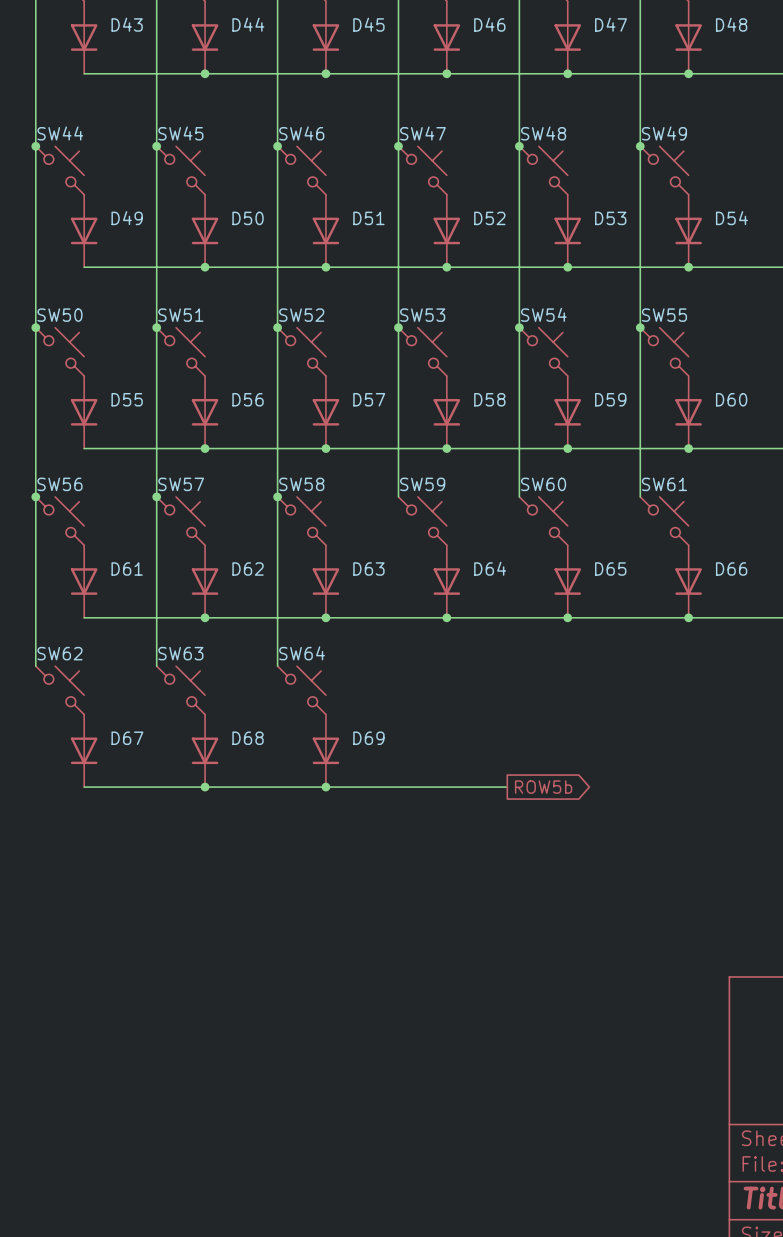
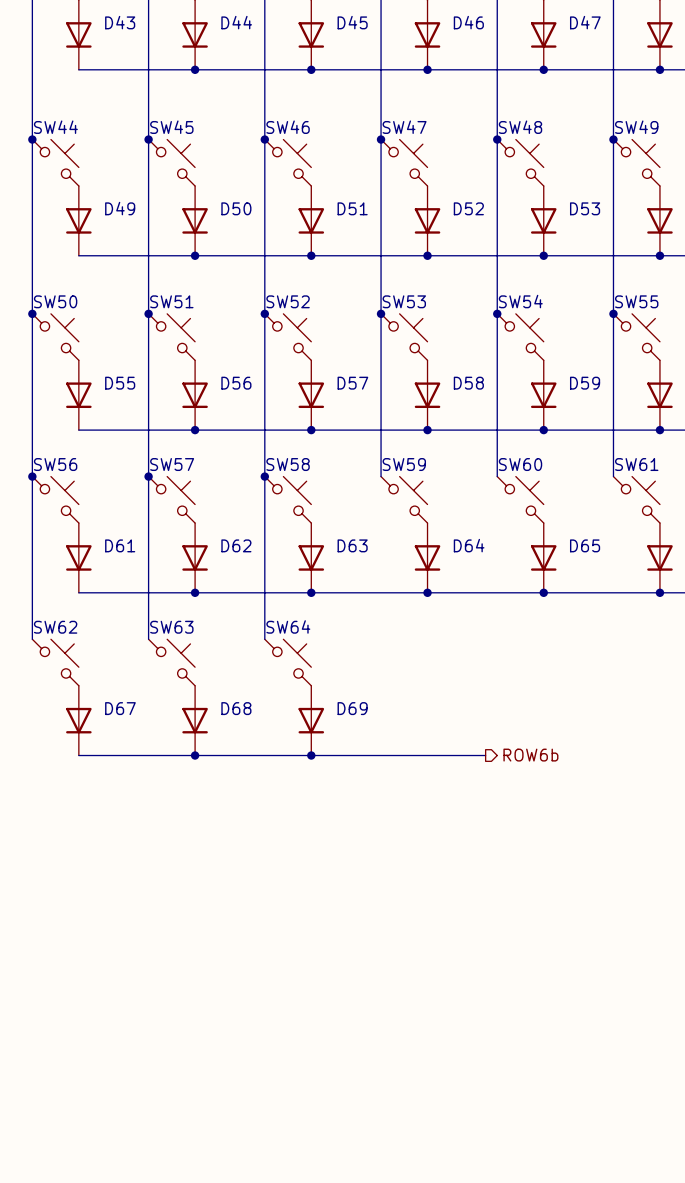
hierarchical label: none -> ROW6b (530, 755)
global label: ROW5b (543, 787) -> none

